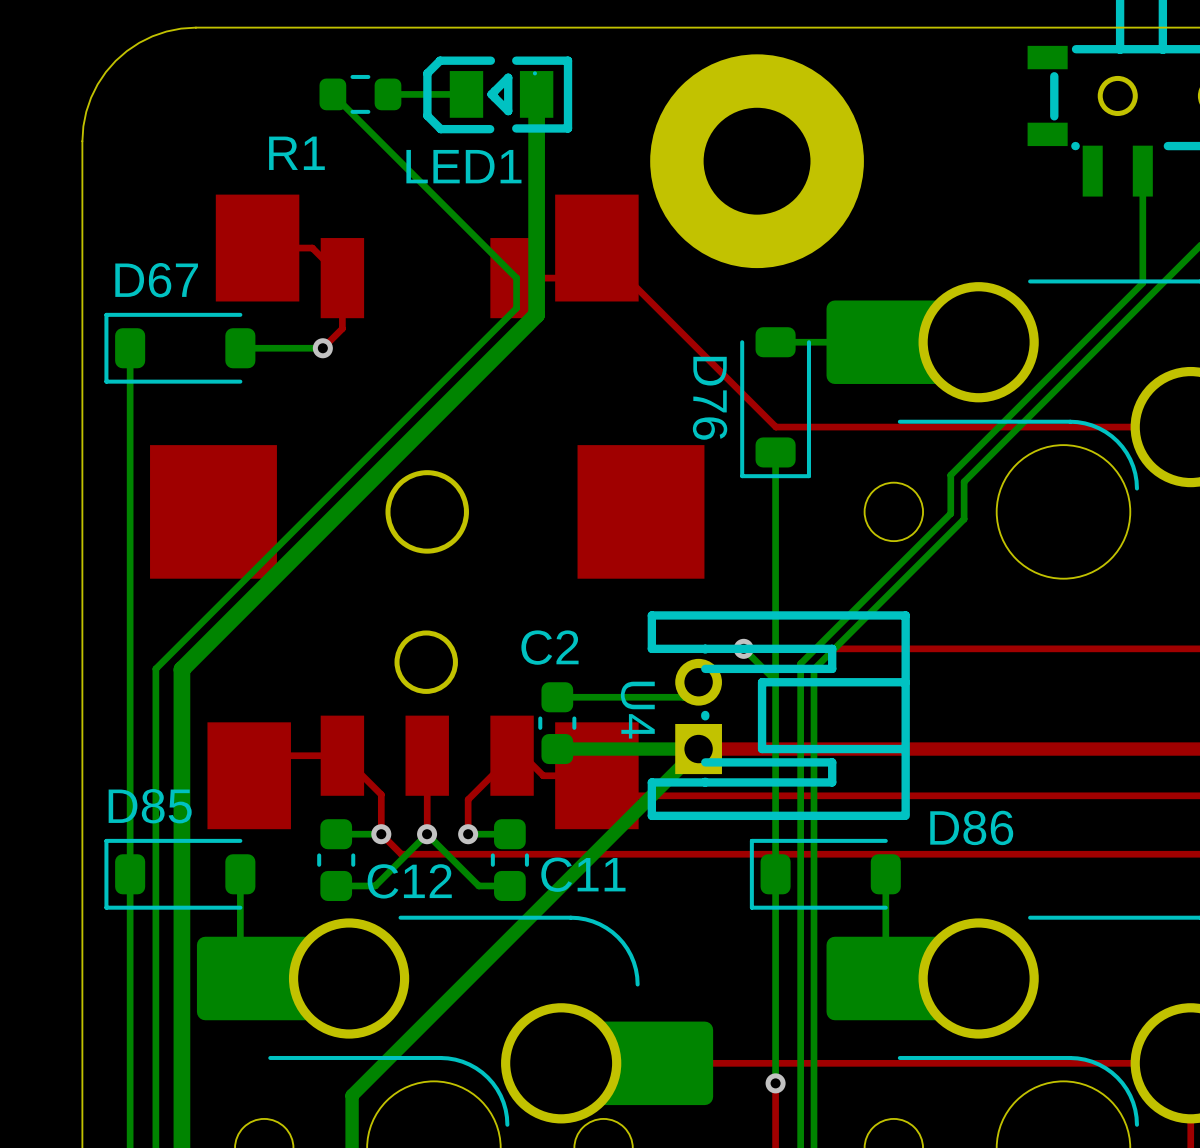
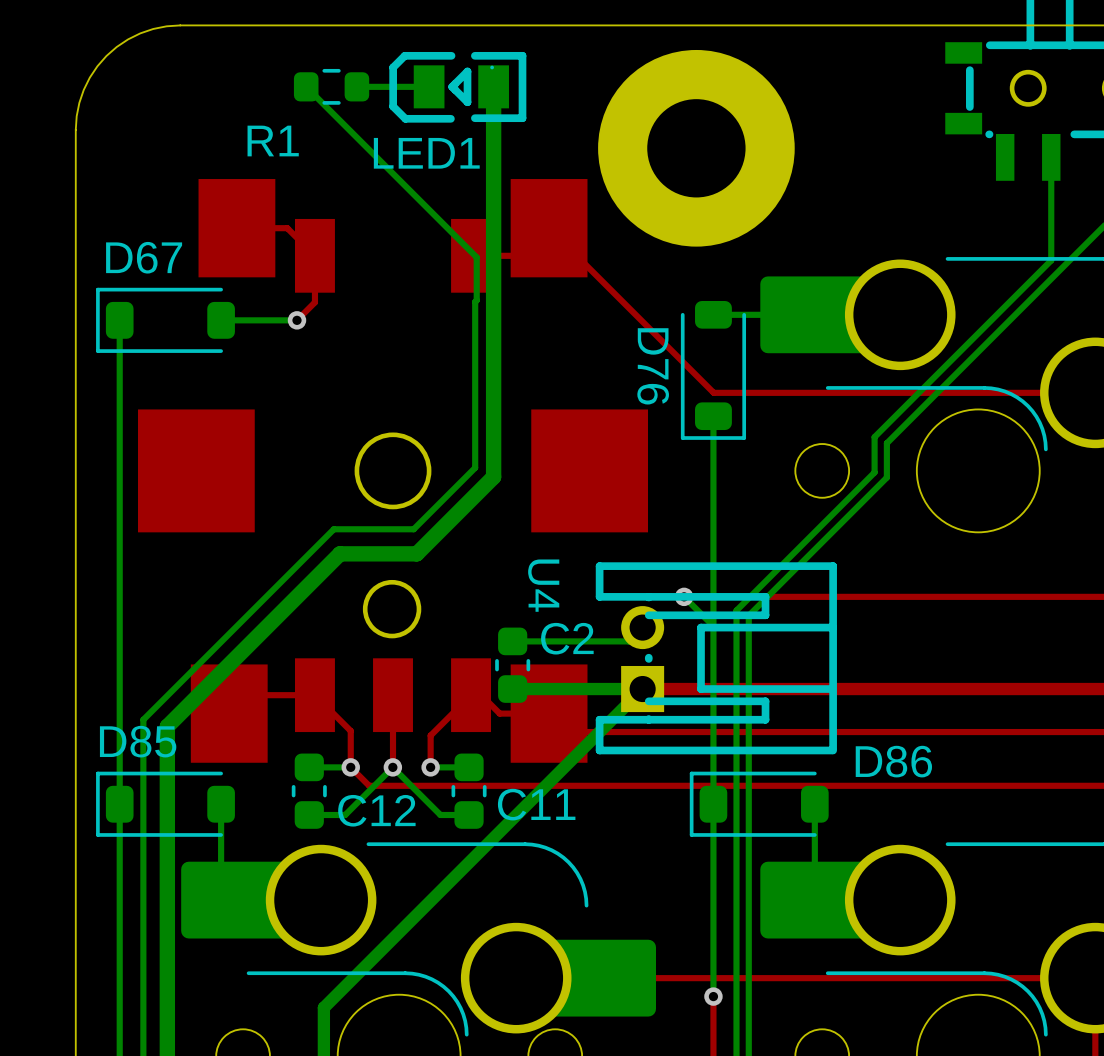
bottom track: (516, 278) (516, 308) (155, 668) (155, 782) -> (475, 255) (476, 257) (475, 467) (413, 529) (333, 529) (143, 719)
bottom track: (536, 314) (181, 669) (181, 789) -> (493, 289) (493, 477) (416, 553) (340, 553) (167, 726)
C2 name position: C2 (549, 647) -> C2 (567, 638)
U4 name position: U4 (637, 710) -> U4 (543, 585)

